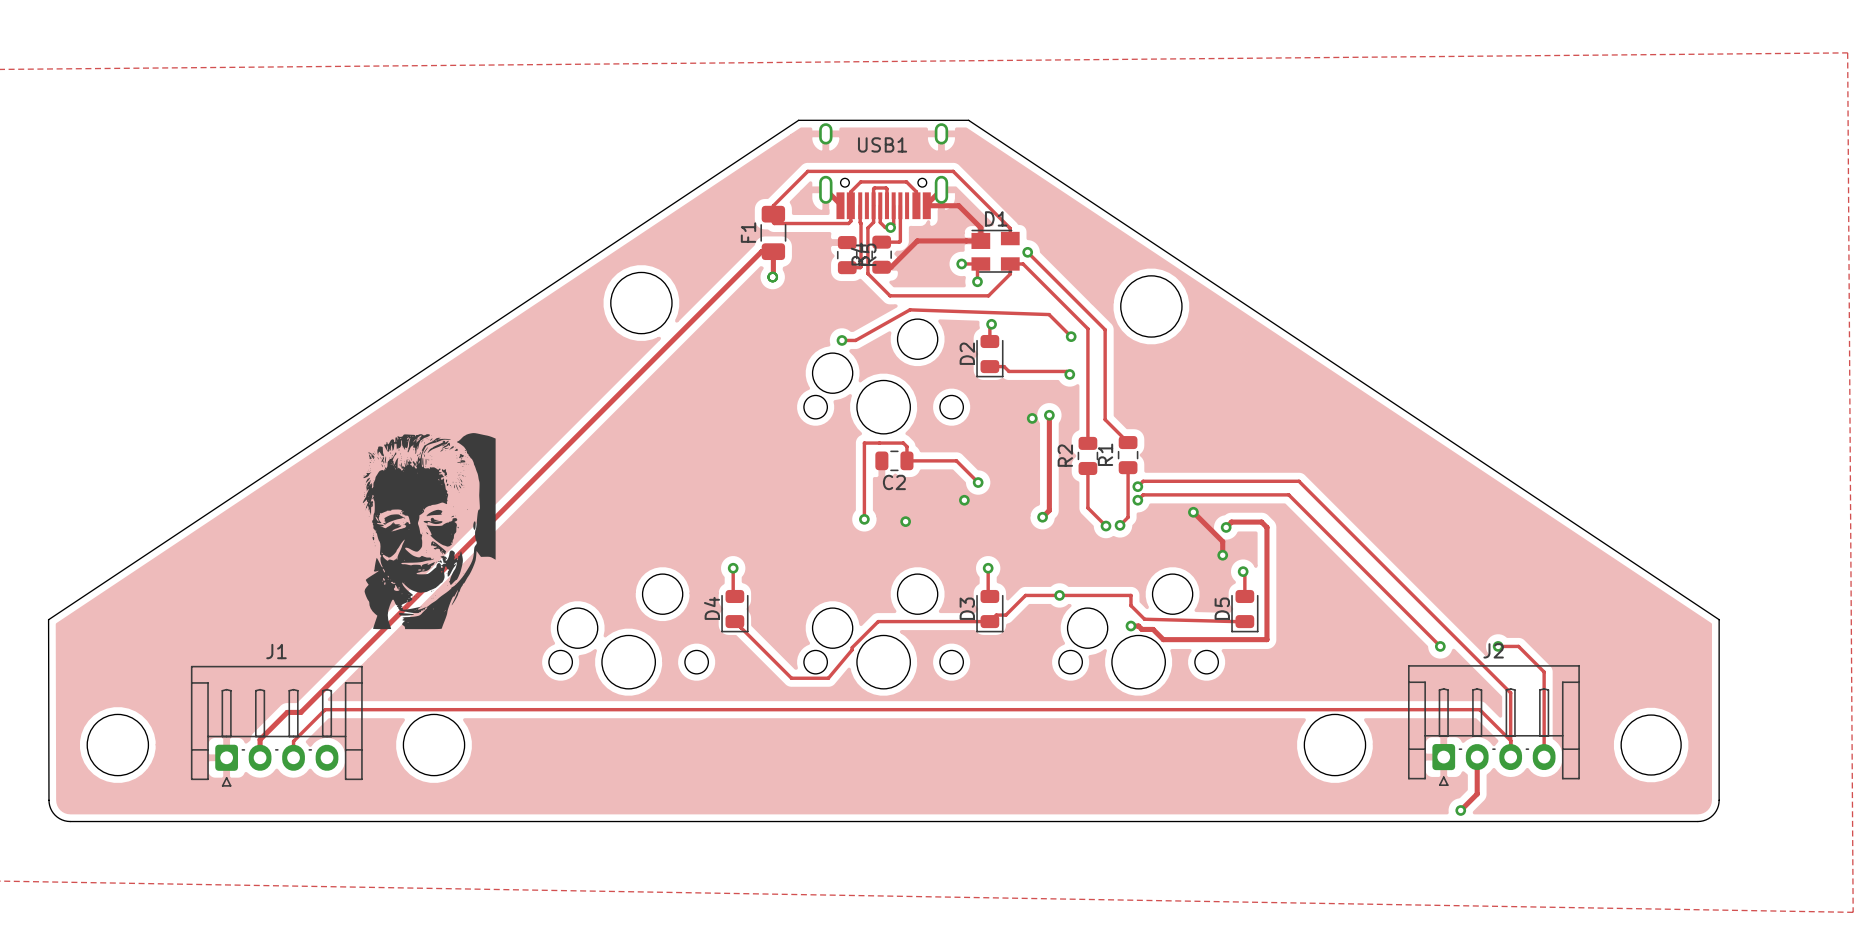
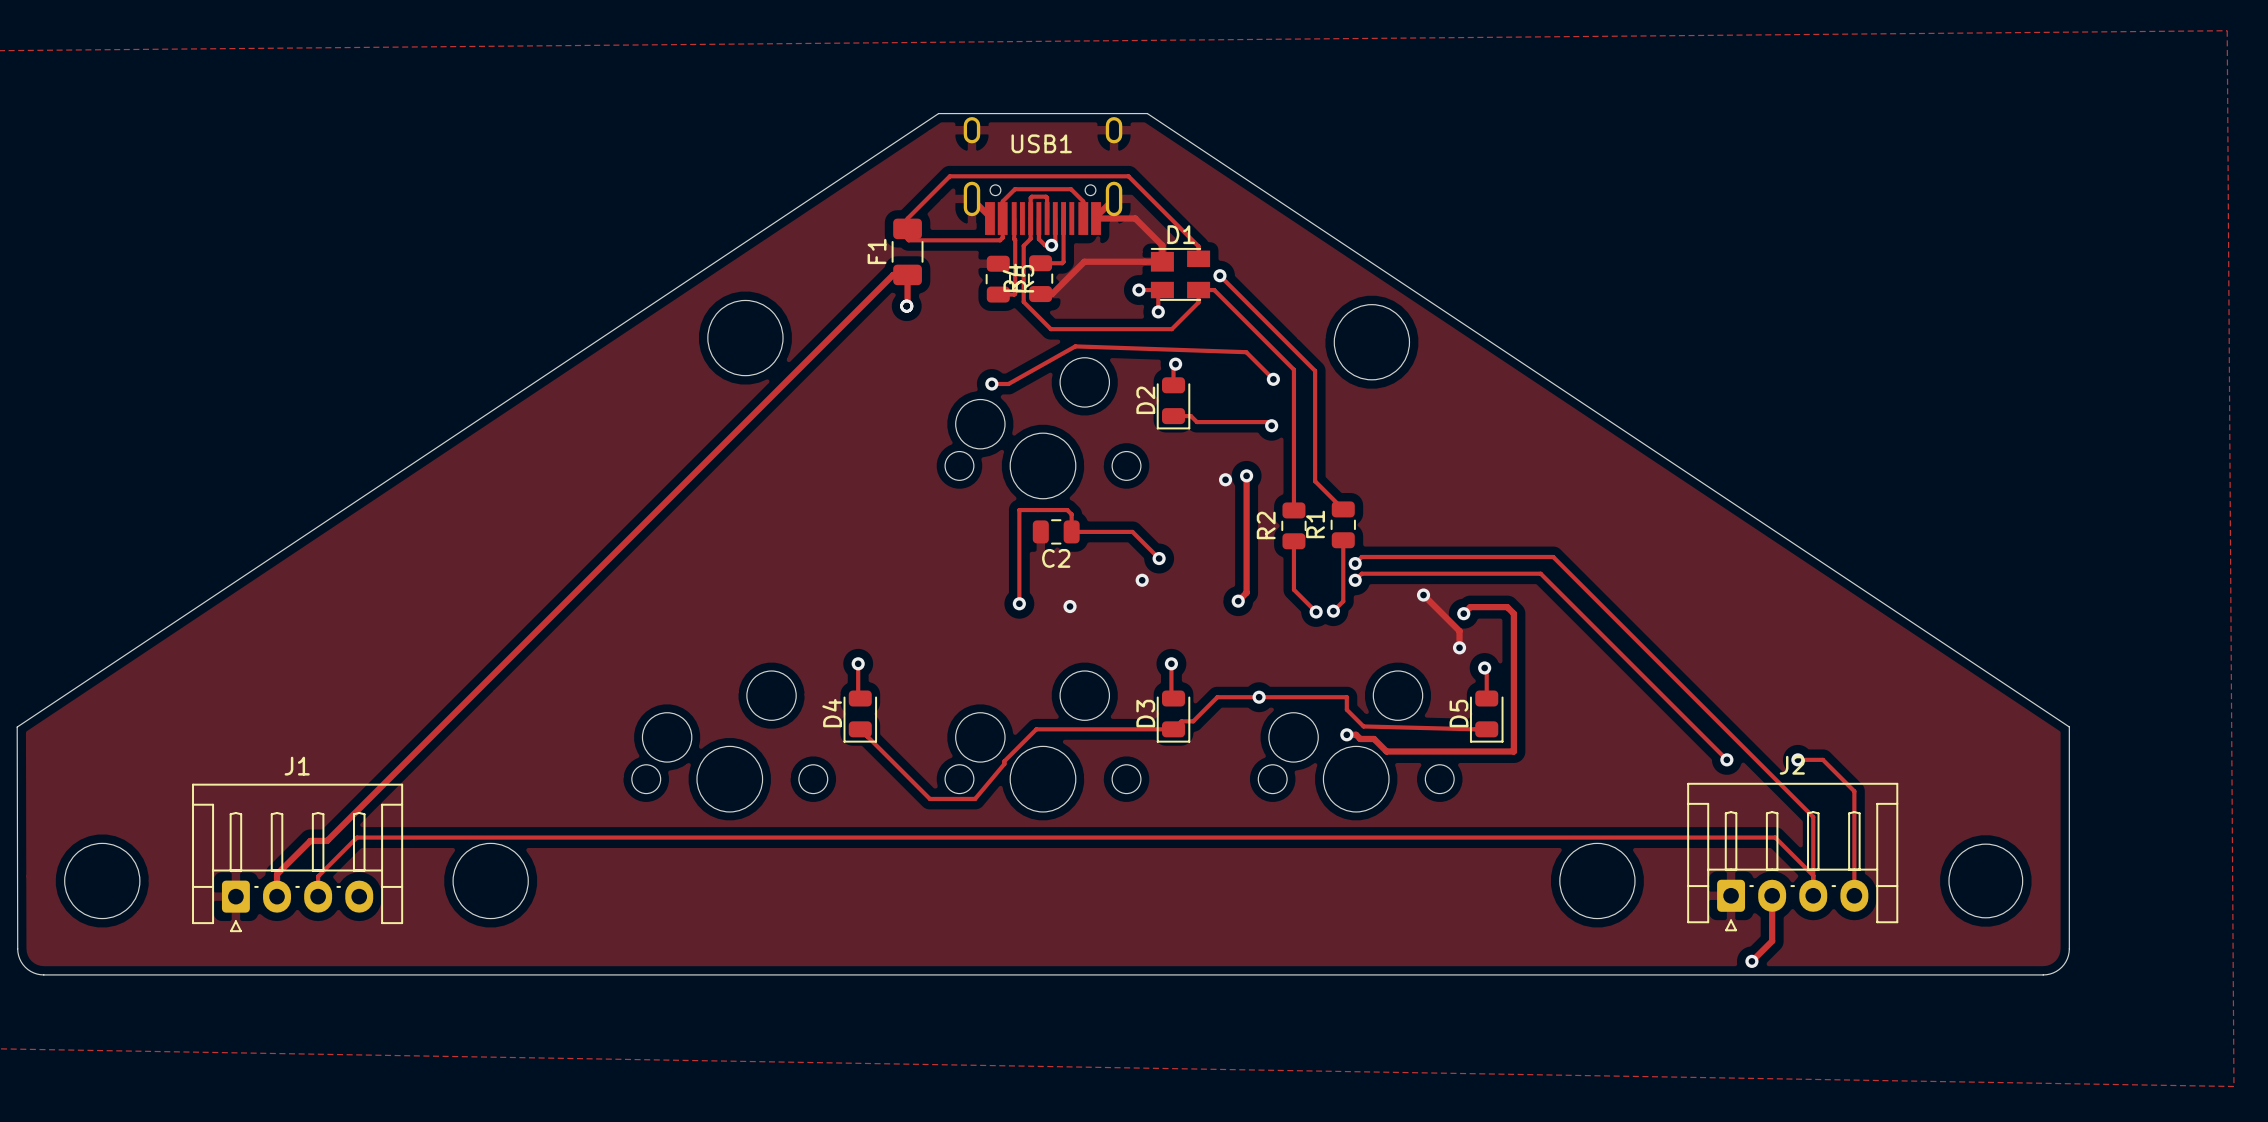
drawing: [362, 433, 496, 630] -> none

